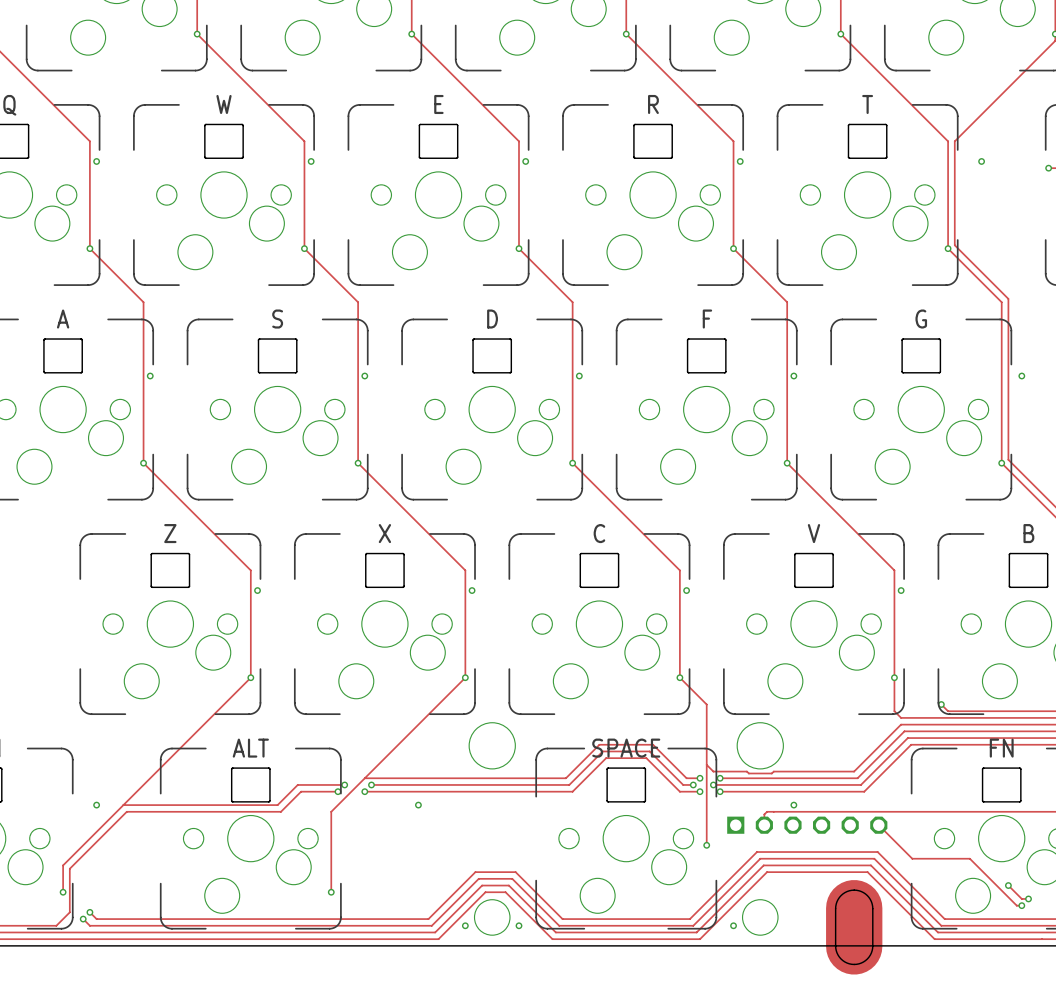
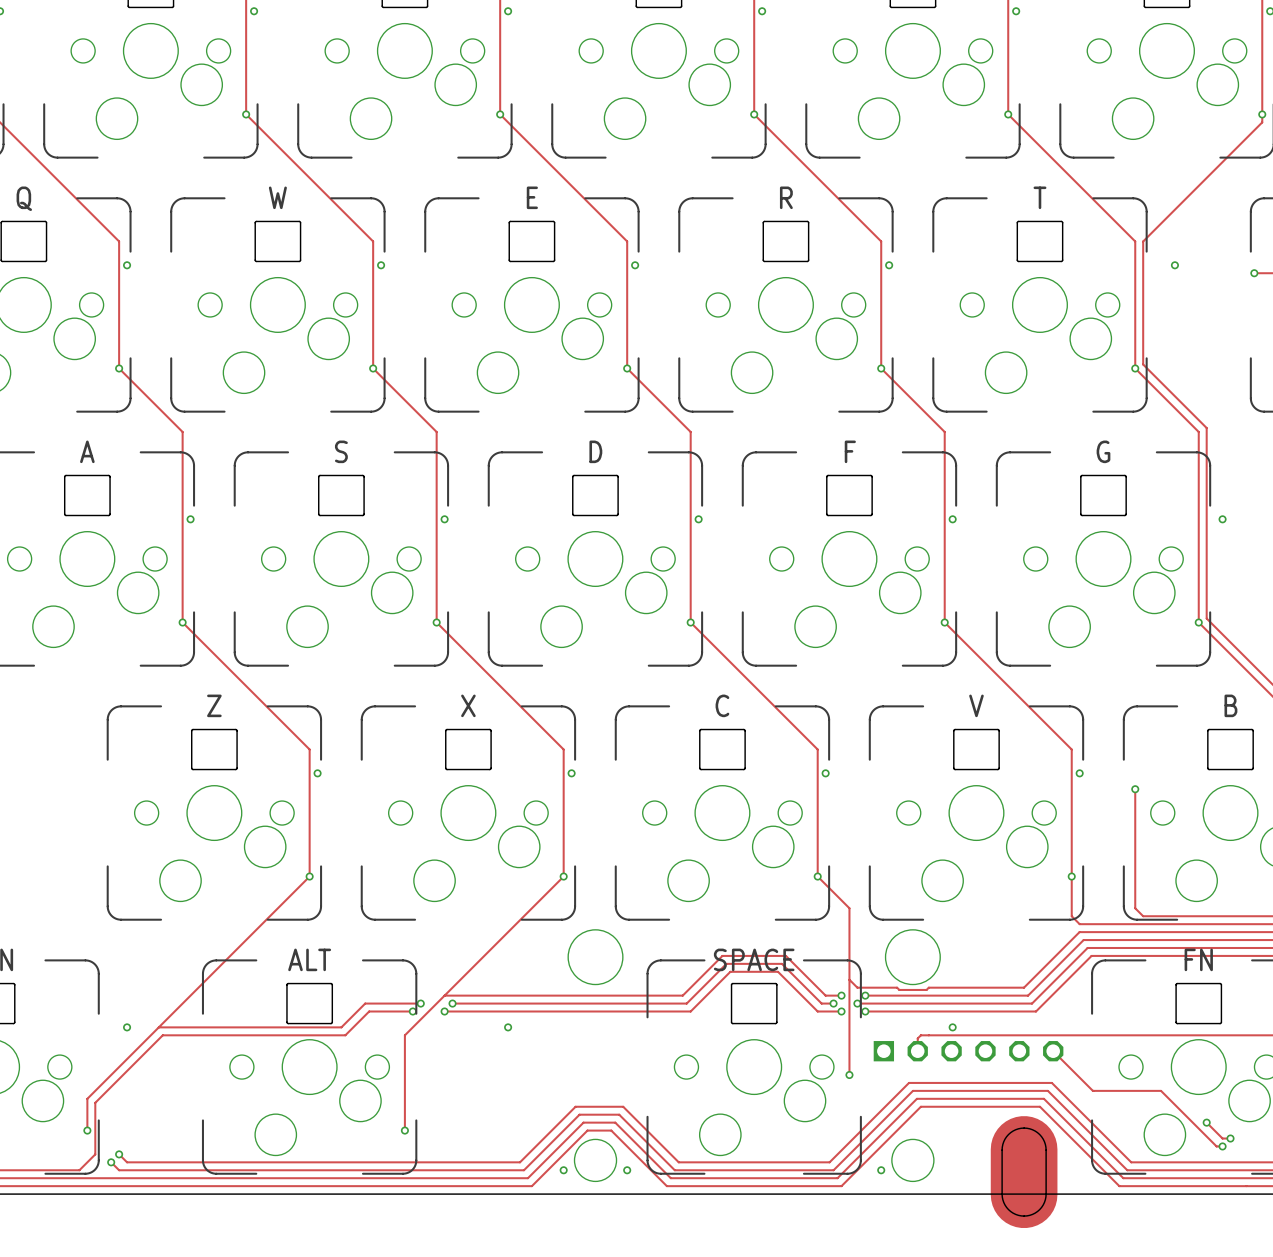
via: none -> (1135, 789)
track: (941, 704) (948, 711) (954, 711) -> (1135, 789) (1135, 908) (1143, 916)
via: (941, 704) -> none

